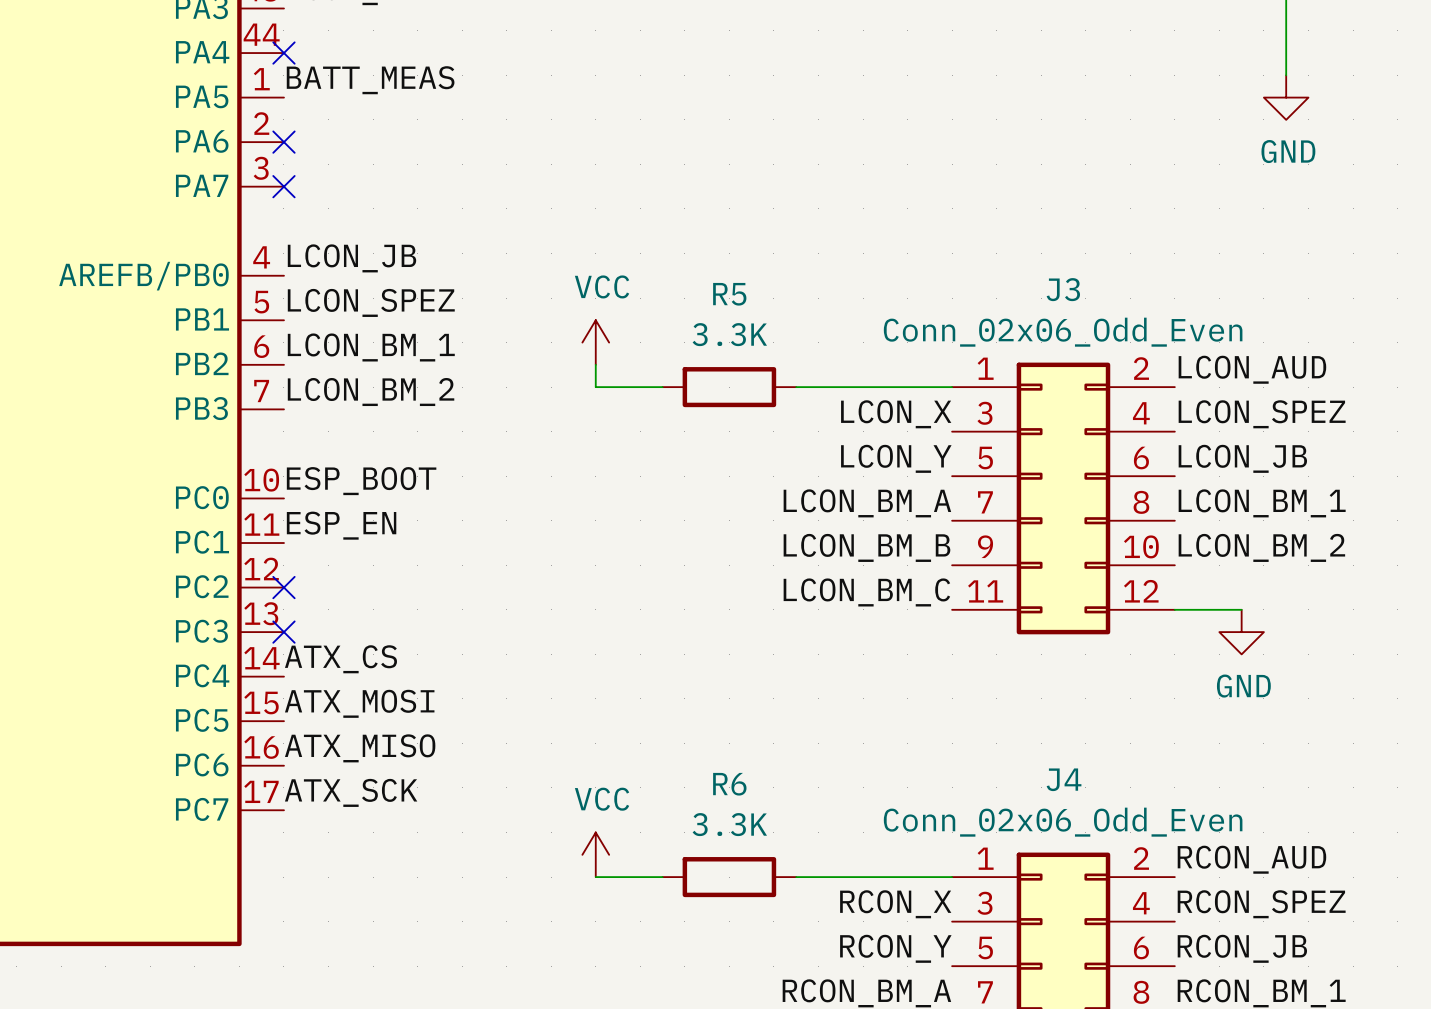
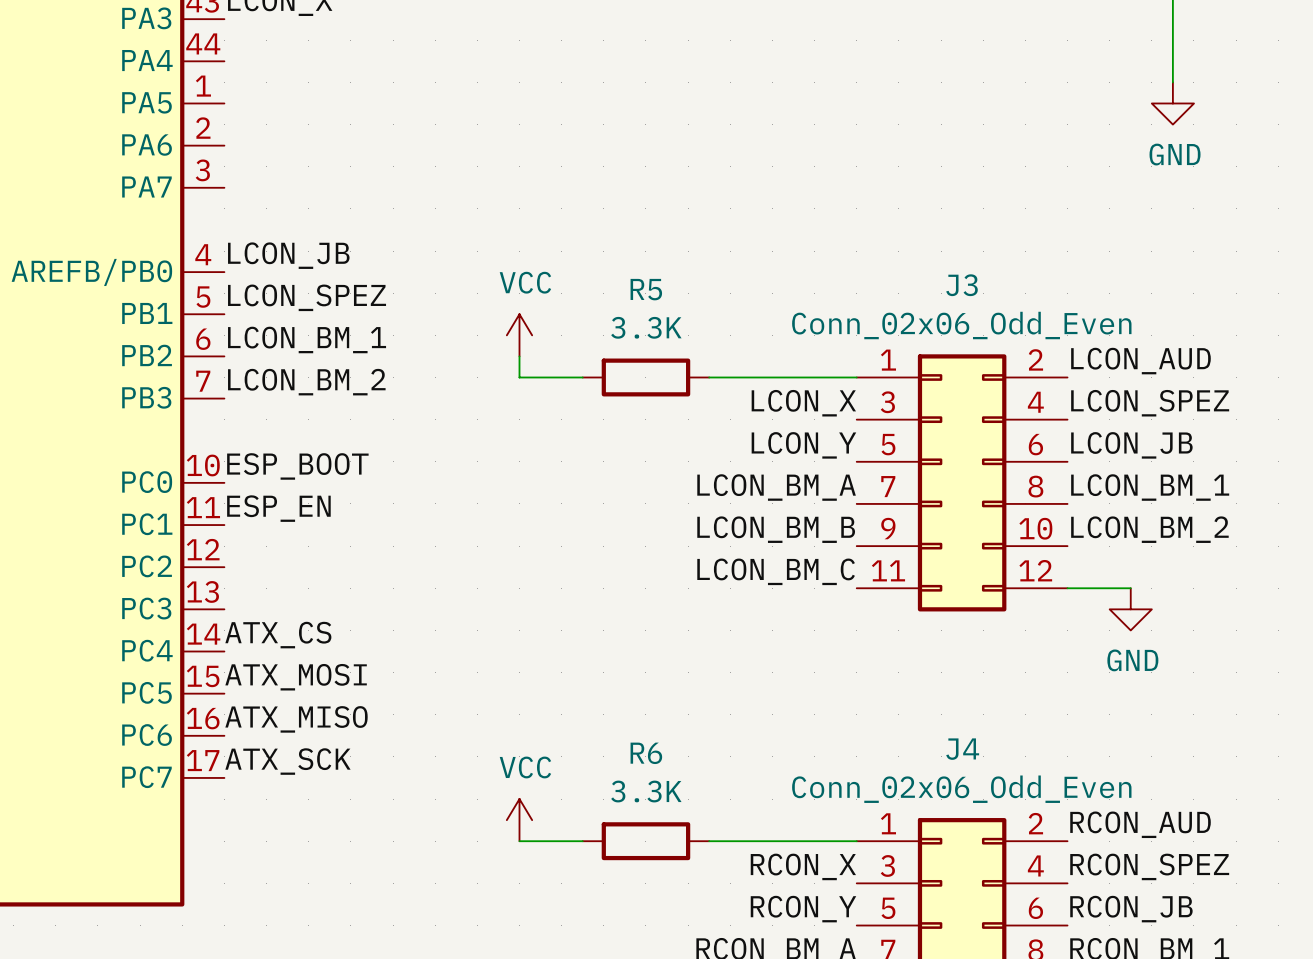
no-connect mark: (283, 53) -> none
label: BATT_MEAS (370, 80) -> none
no-connect mark: (283, 142) -> none
no-connect mark: (283, 186) -> none
no-connect mark: (283, 587) -> none
no-connect mark: (283, 632) -> none

